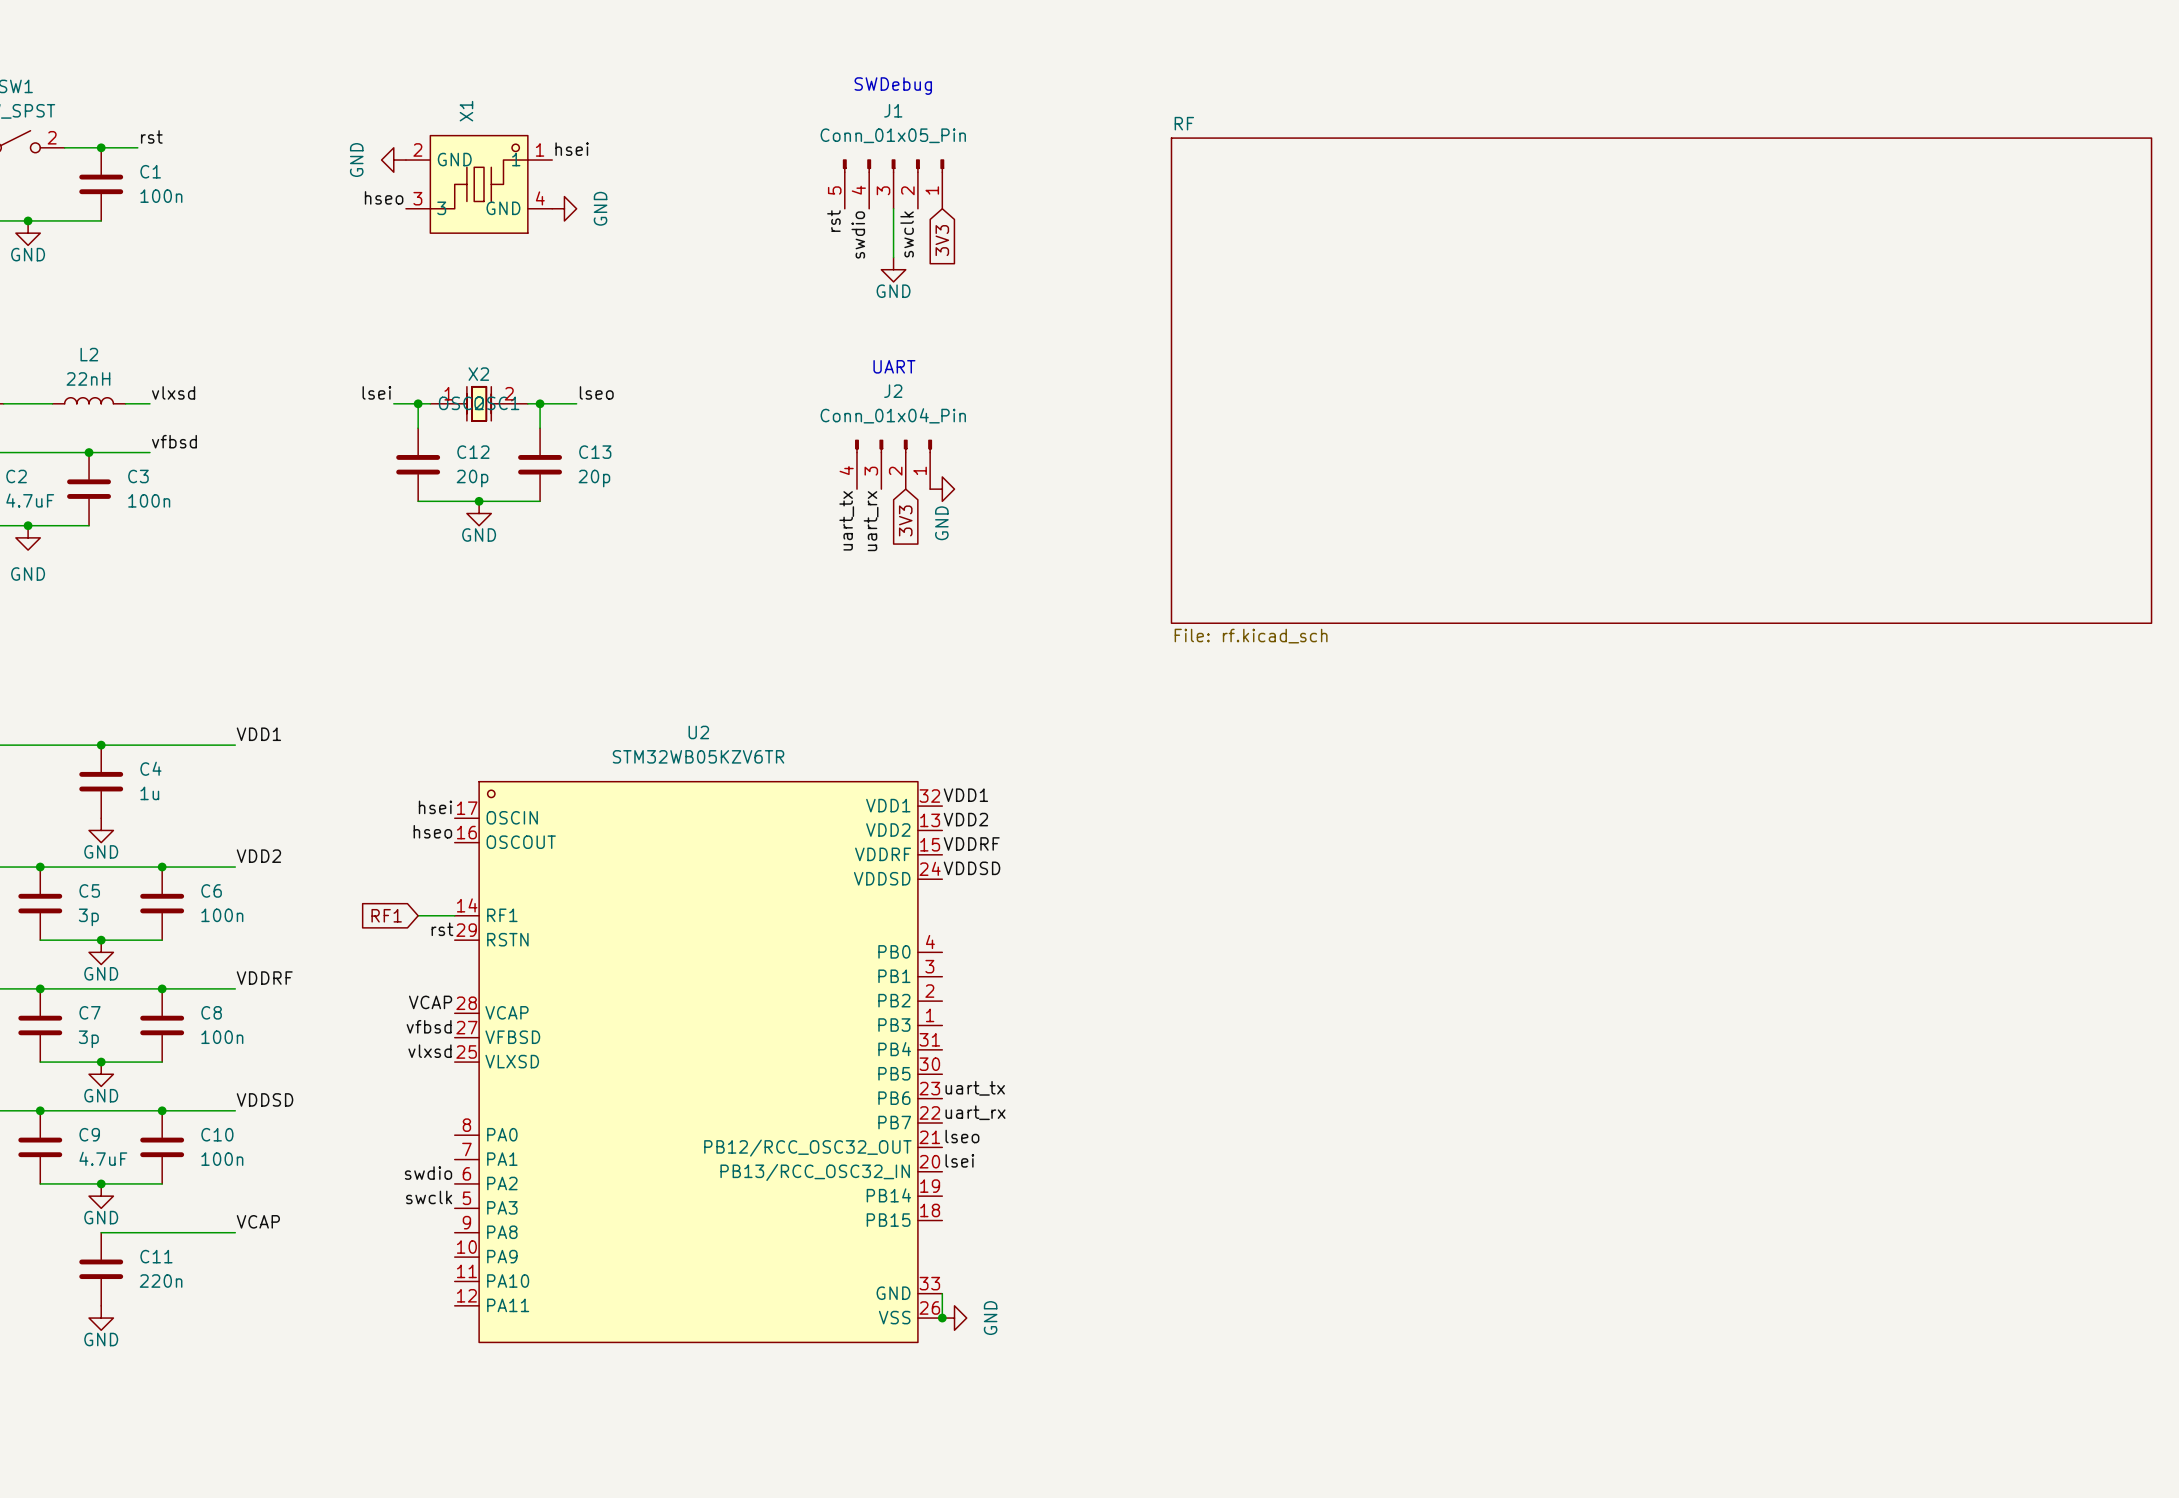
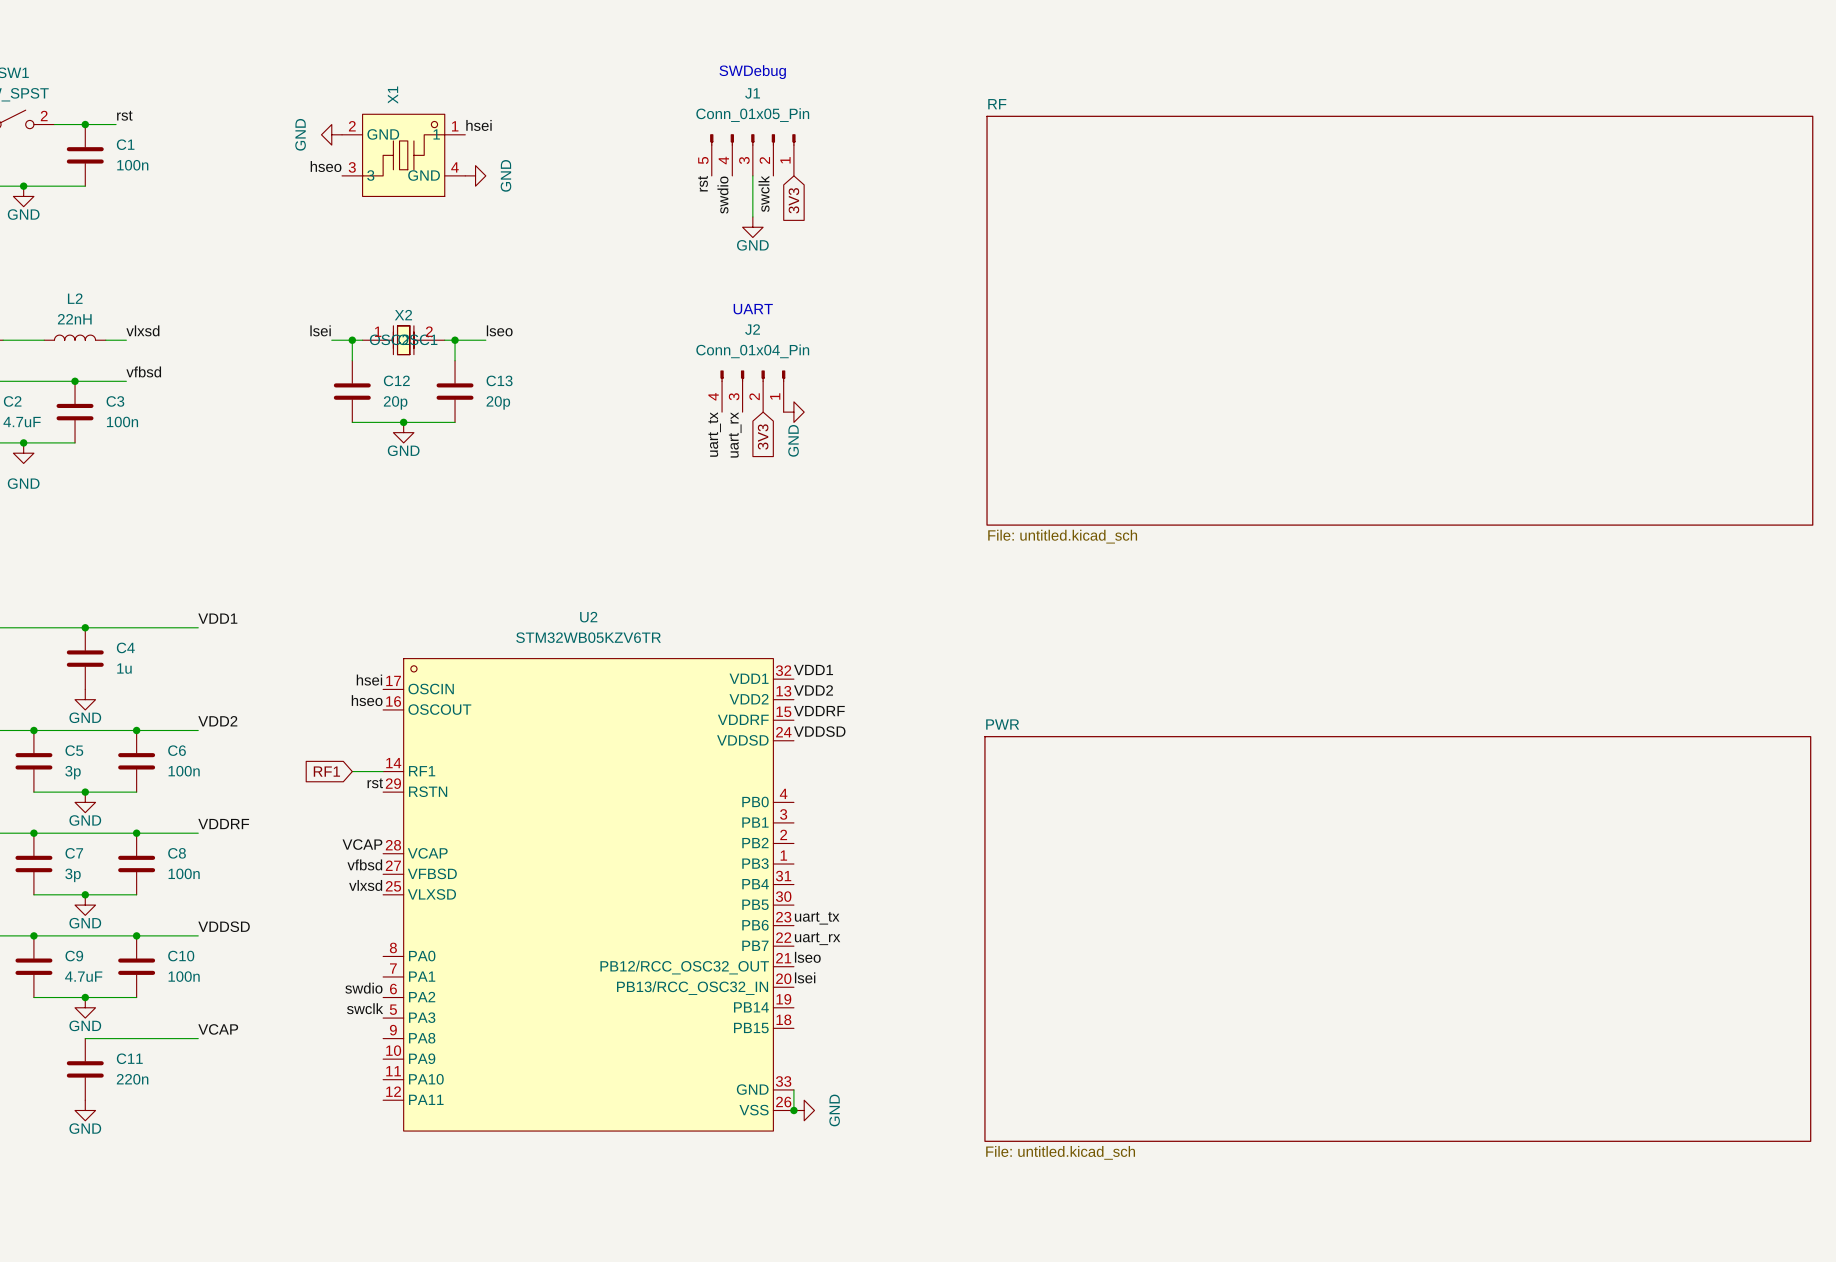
sheet RF value: File: rf.kicad_sch (1251, 636) -> File: untitled.kicad_sch (1062, 536)
sheet PWR: none -> File: untitled.kicad_sch (1397, 938)

